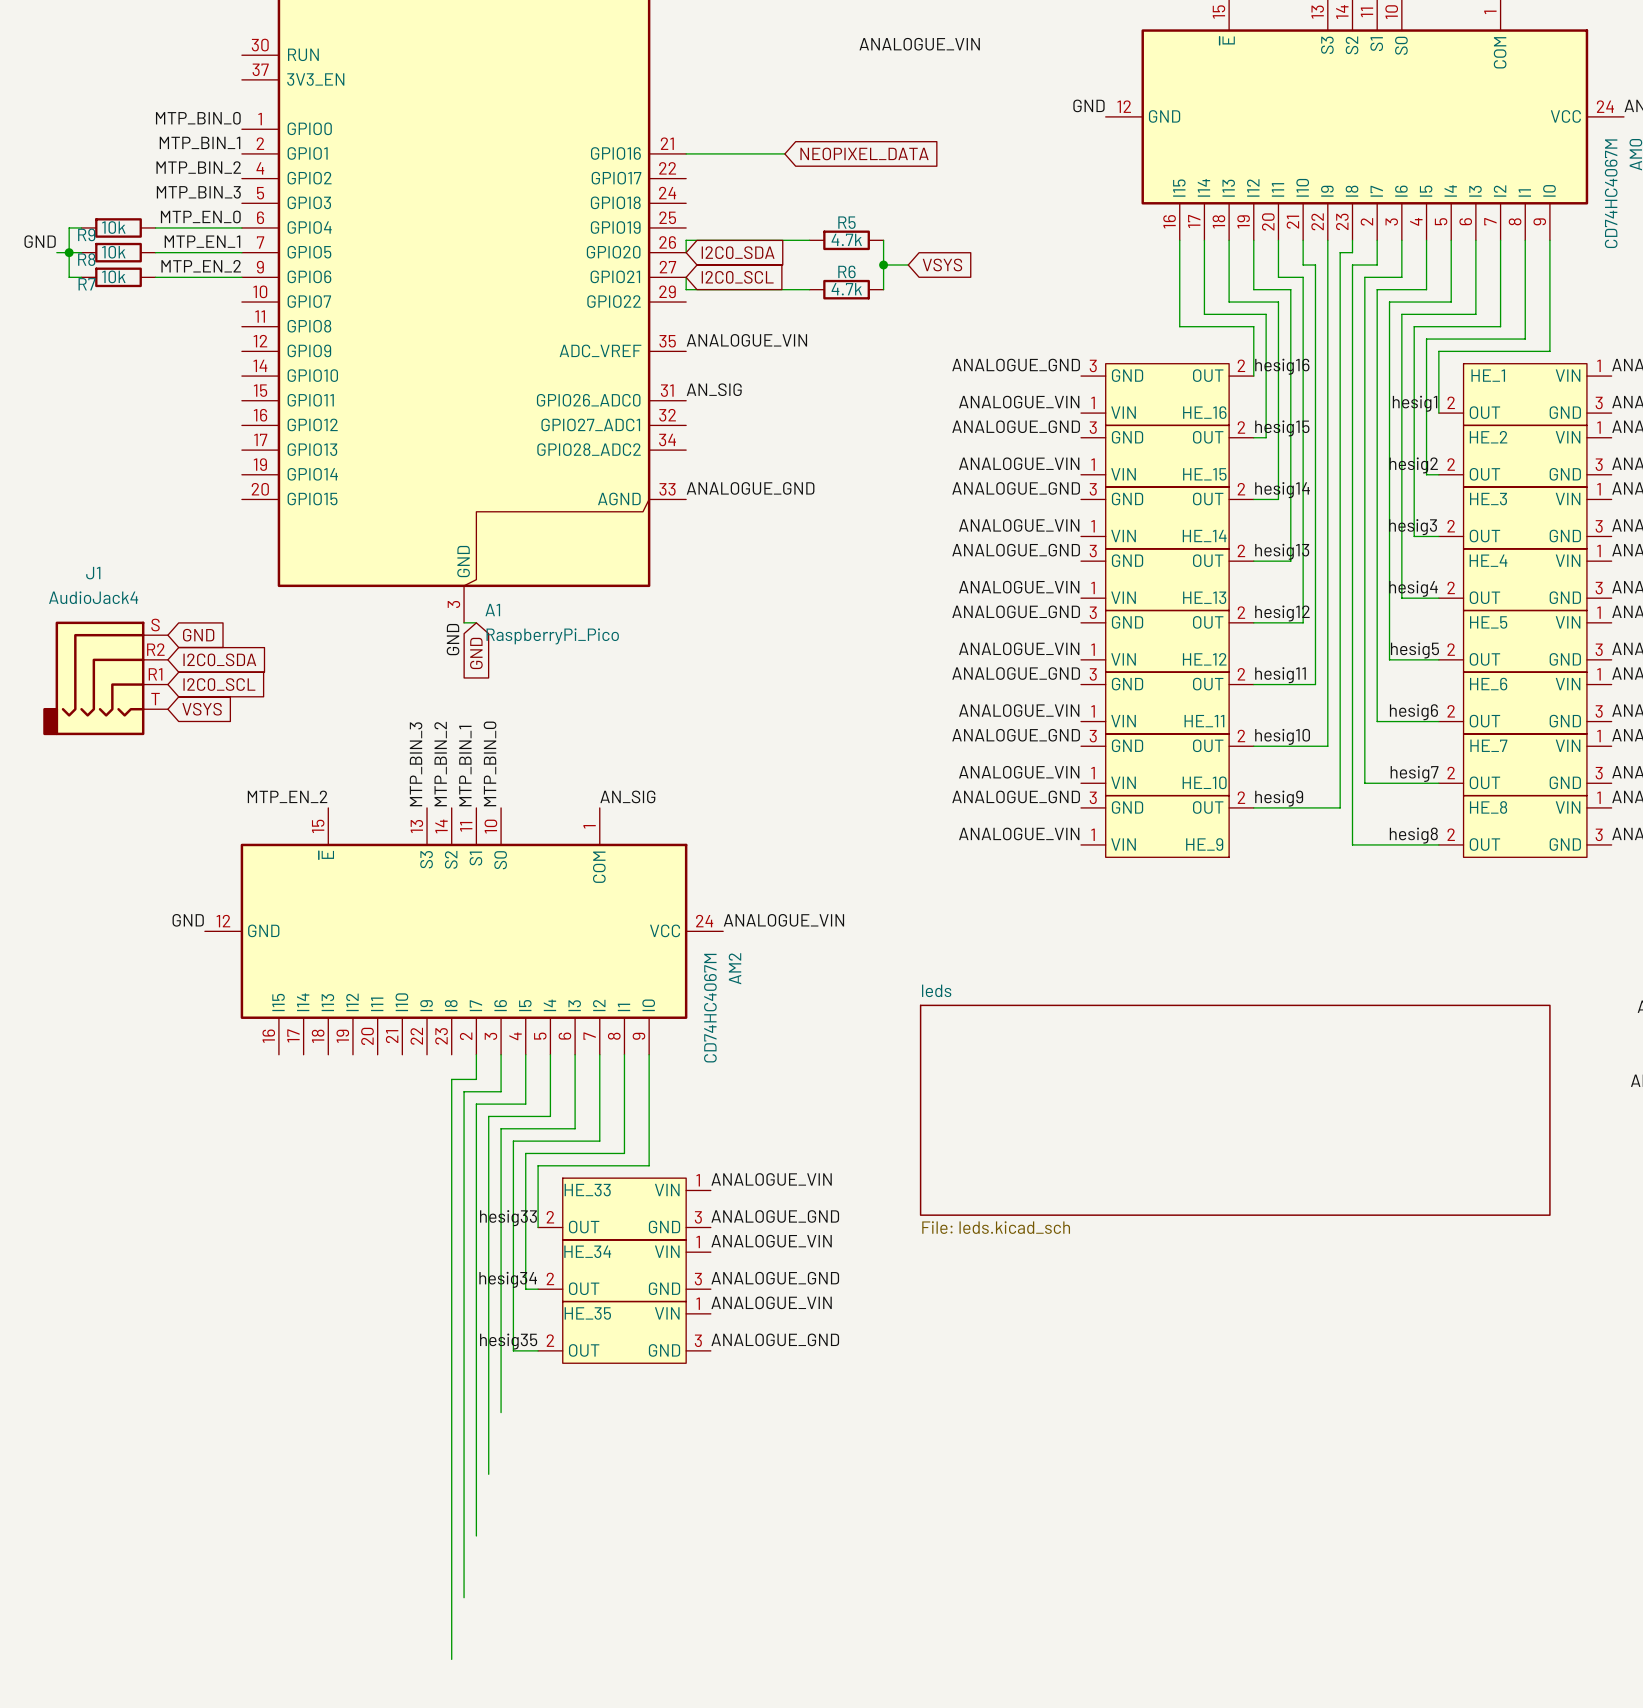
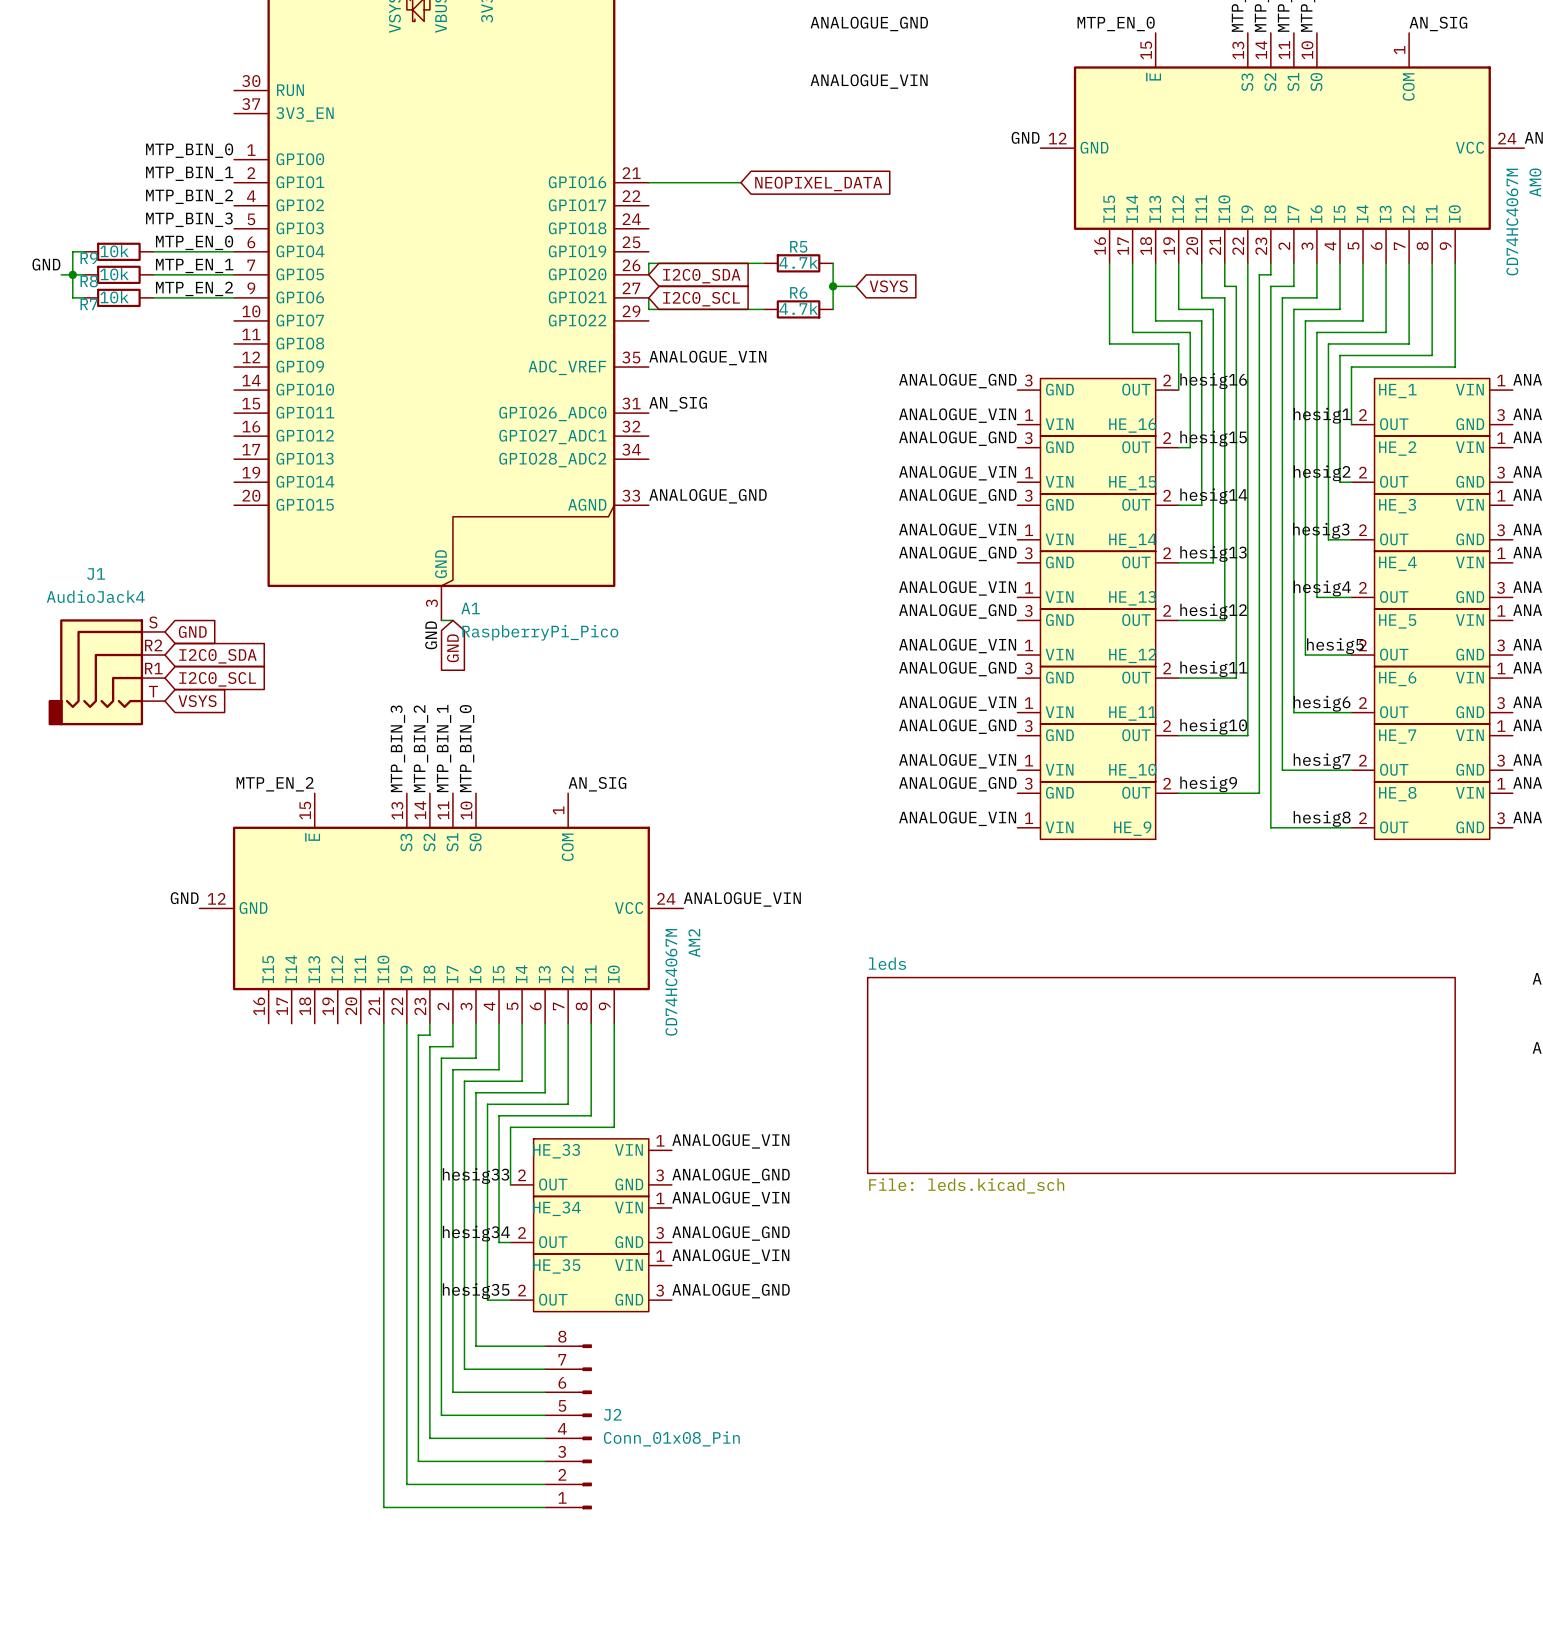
wire: none -> (383, 1023) (383, 1507) (545, 1507)
wire: none -> (406, 1023) (406, 1484) (545, 1484)
wire: none -> (429, 1023) (429, 1035) (418, 1035) (418, 1461) (545, 1461)
wire: (501, 1400) (501, 1412) -> (475, 1346) (545, 1346)
wire: (488, 1424) (488, 1474) -> (464, 1369) (545, 1369)
wire: (476, 1449) (476, 1535) -> (452, 1392) (545, 1392)
wire: (464, 1474) (464, 1597) -> (441, 1415) (545, 1415)
J2: none -> Conn_01x08_Pin (568, 1426)
wire: (451, 1498) (451, 1659) -> (429, 1438) (545, 1438)

